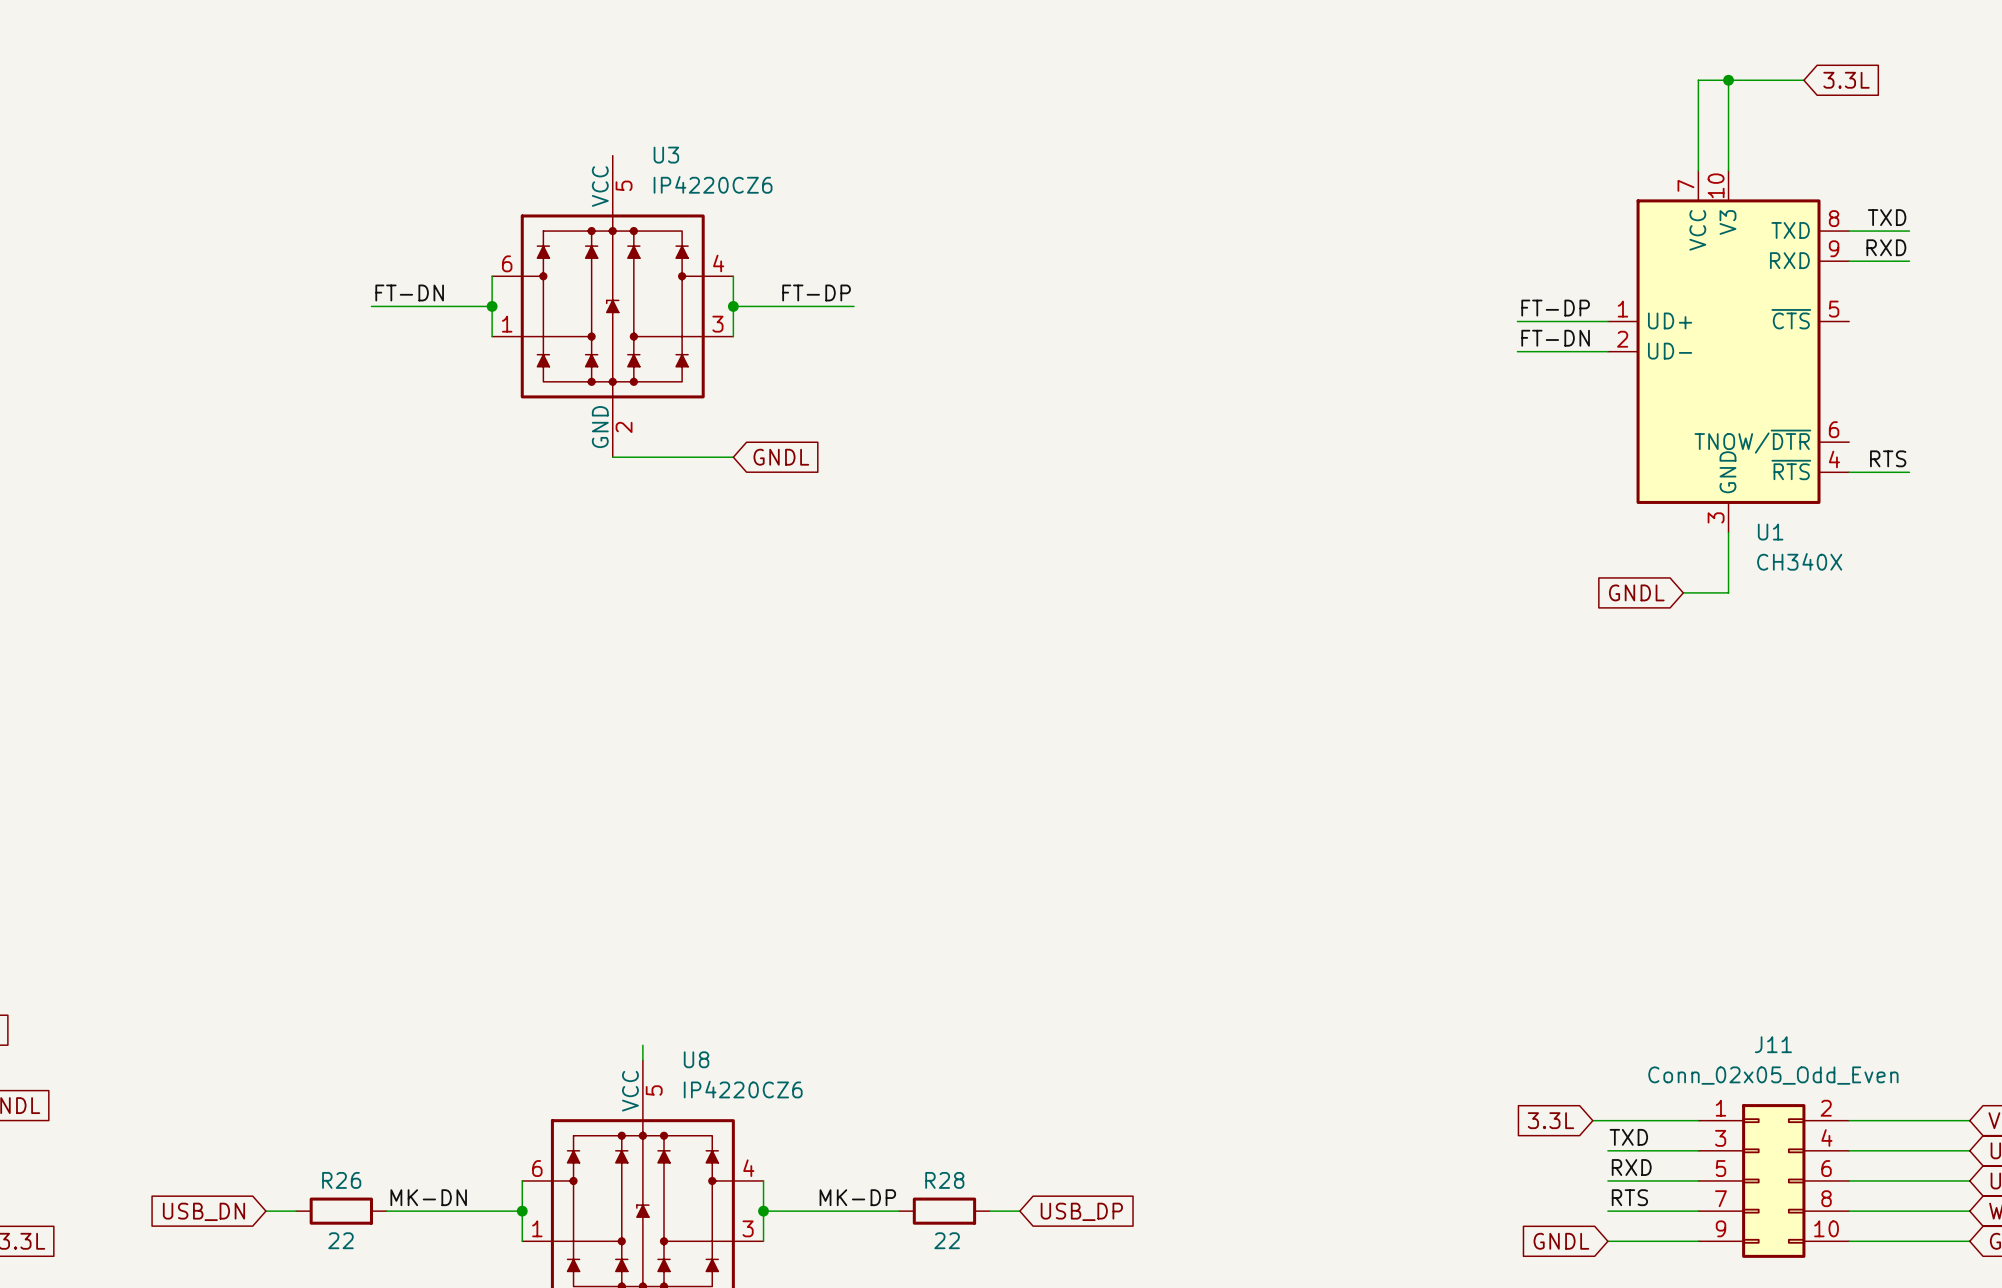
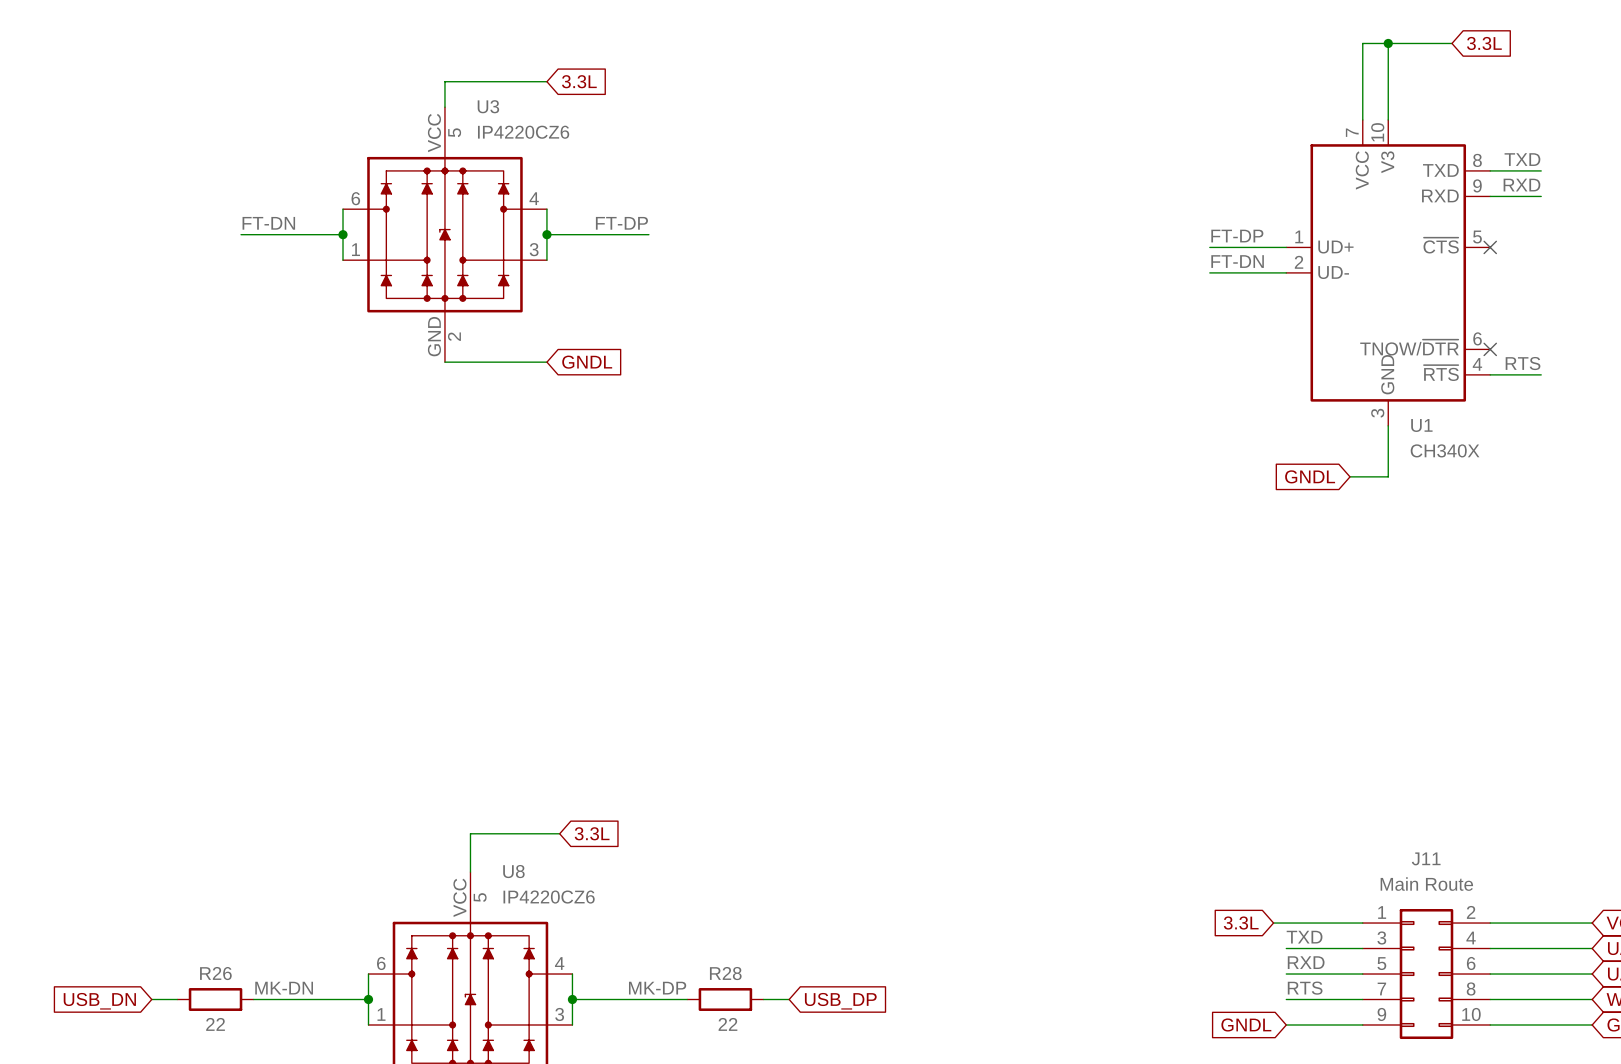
wire: none -> (546, 81) (444, 81) (444, 107)
global label: none -> 3.3L (579, 81)
no-connect mark: none -> (1490, 247)
no-connect mark: none -> (1490, 349)
wire: none -> (559, 833) (470, 833) (470, 859)
global label: none -> 3.3L (592, 833)
J11 value: Conn_02x05_Odd_Even (1773, 1075) -> Main Route (1426, 884)

